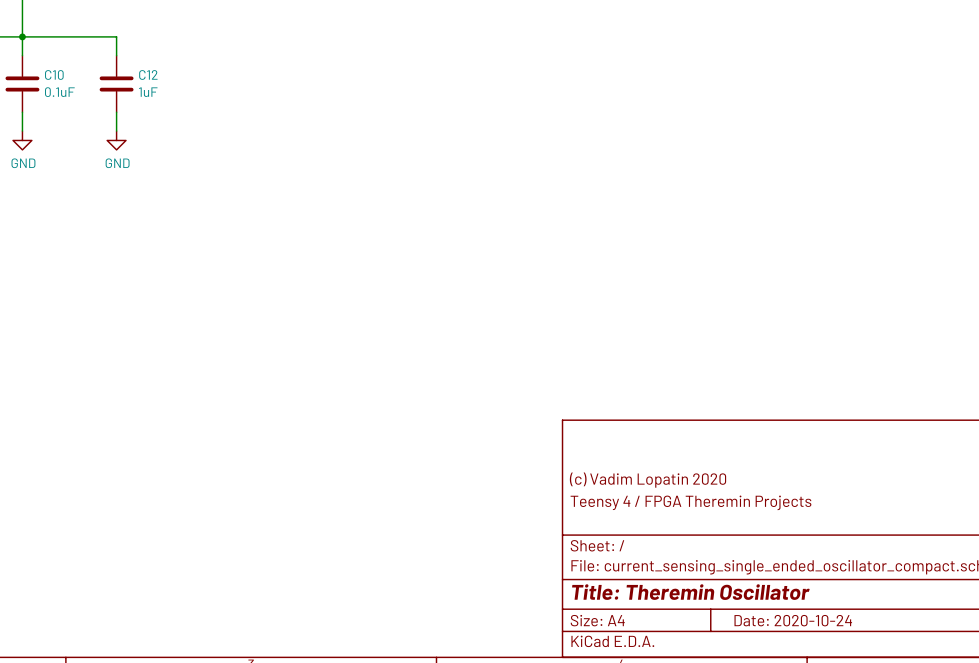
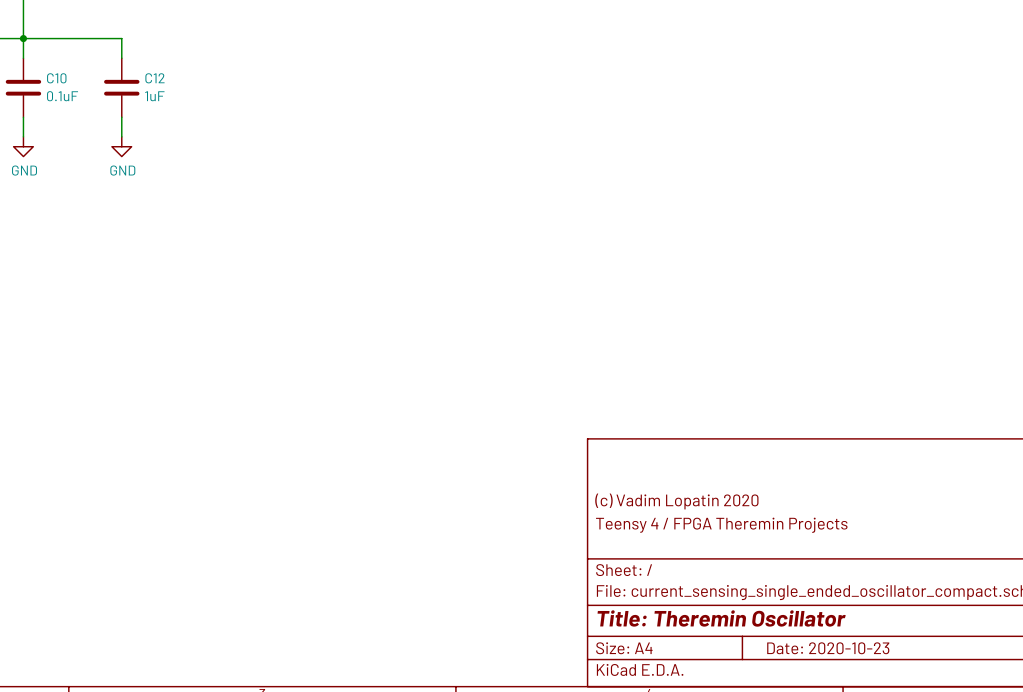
title block: Date: 2020-10-24 (793, 620) -> Date: 2020-10-23 (828, 648)

